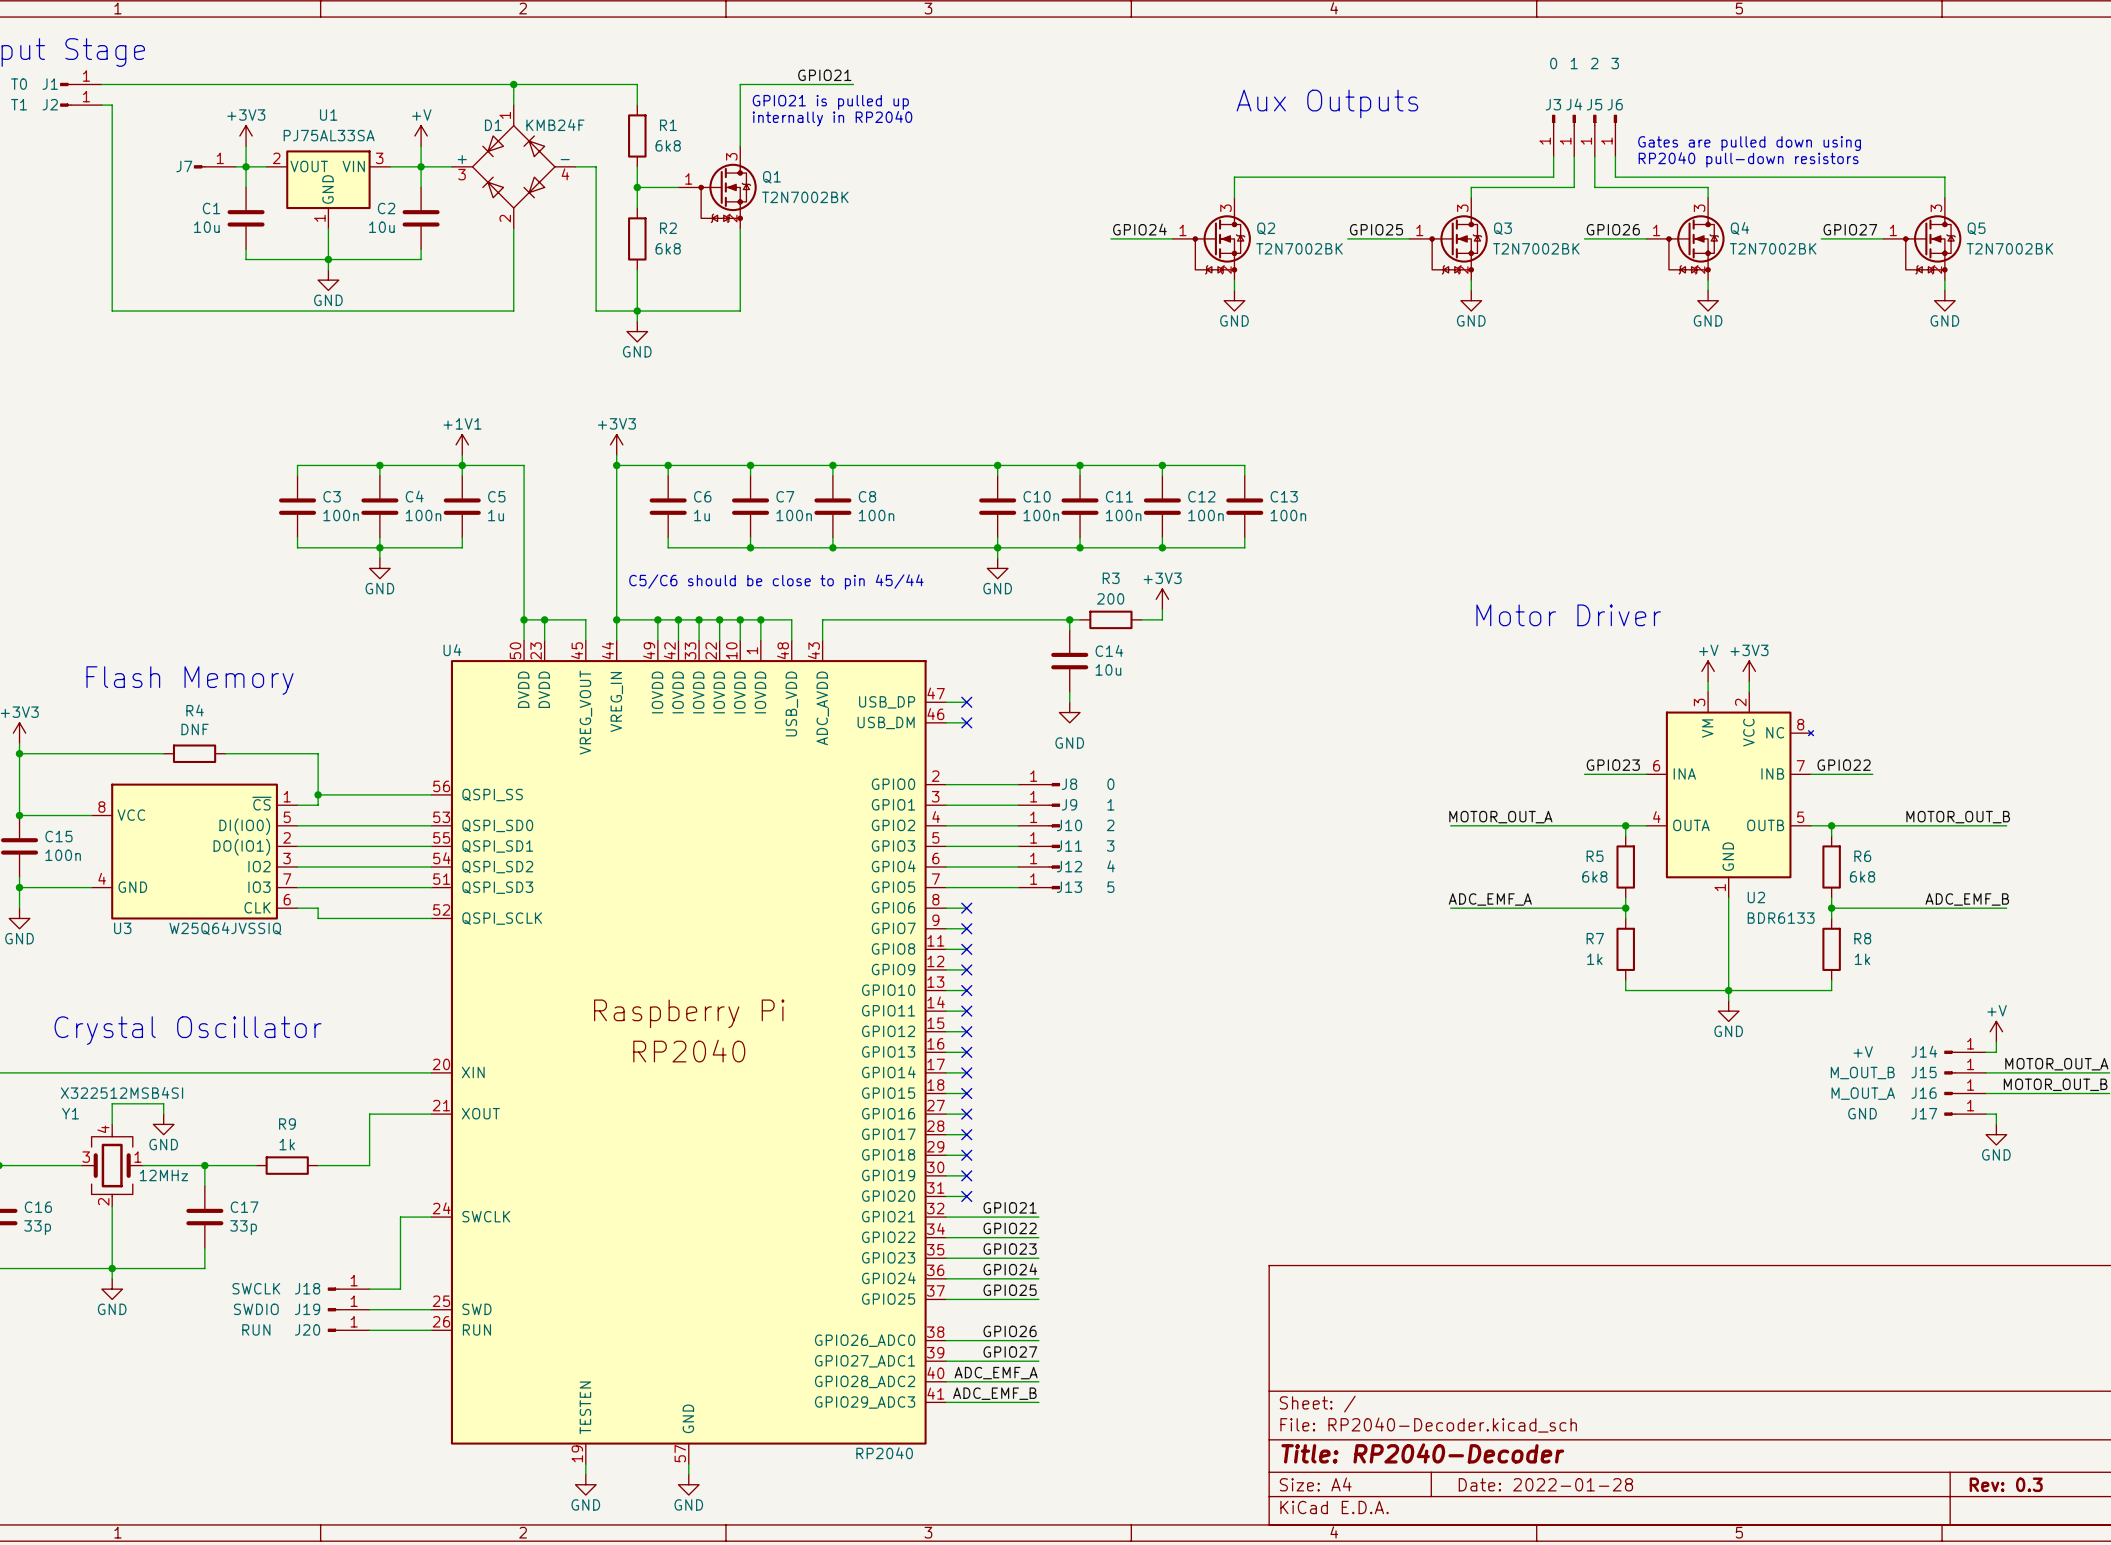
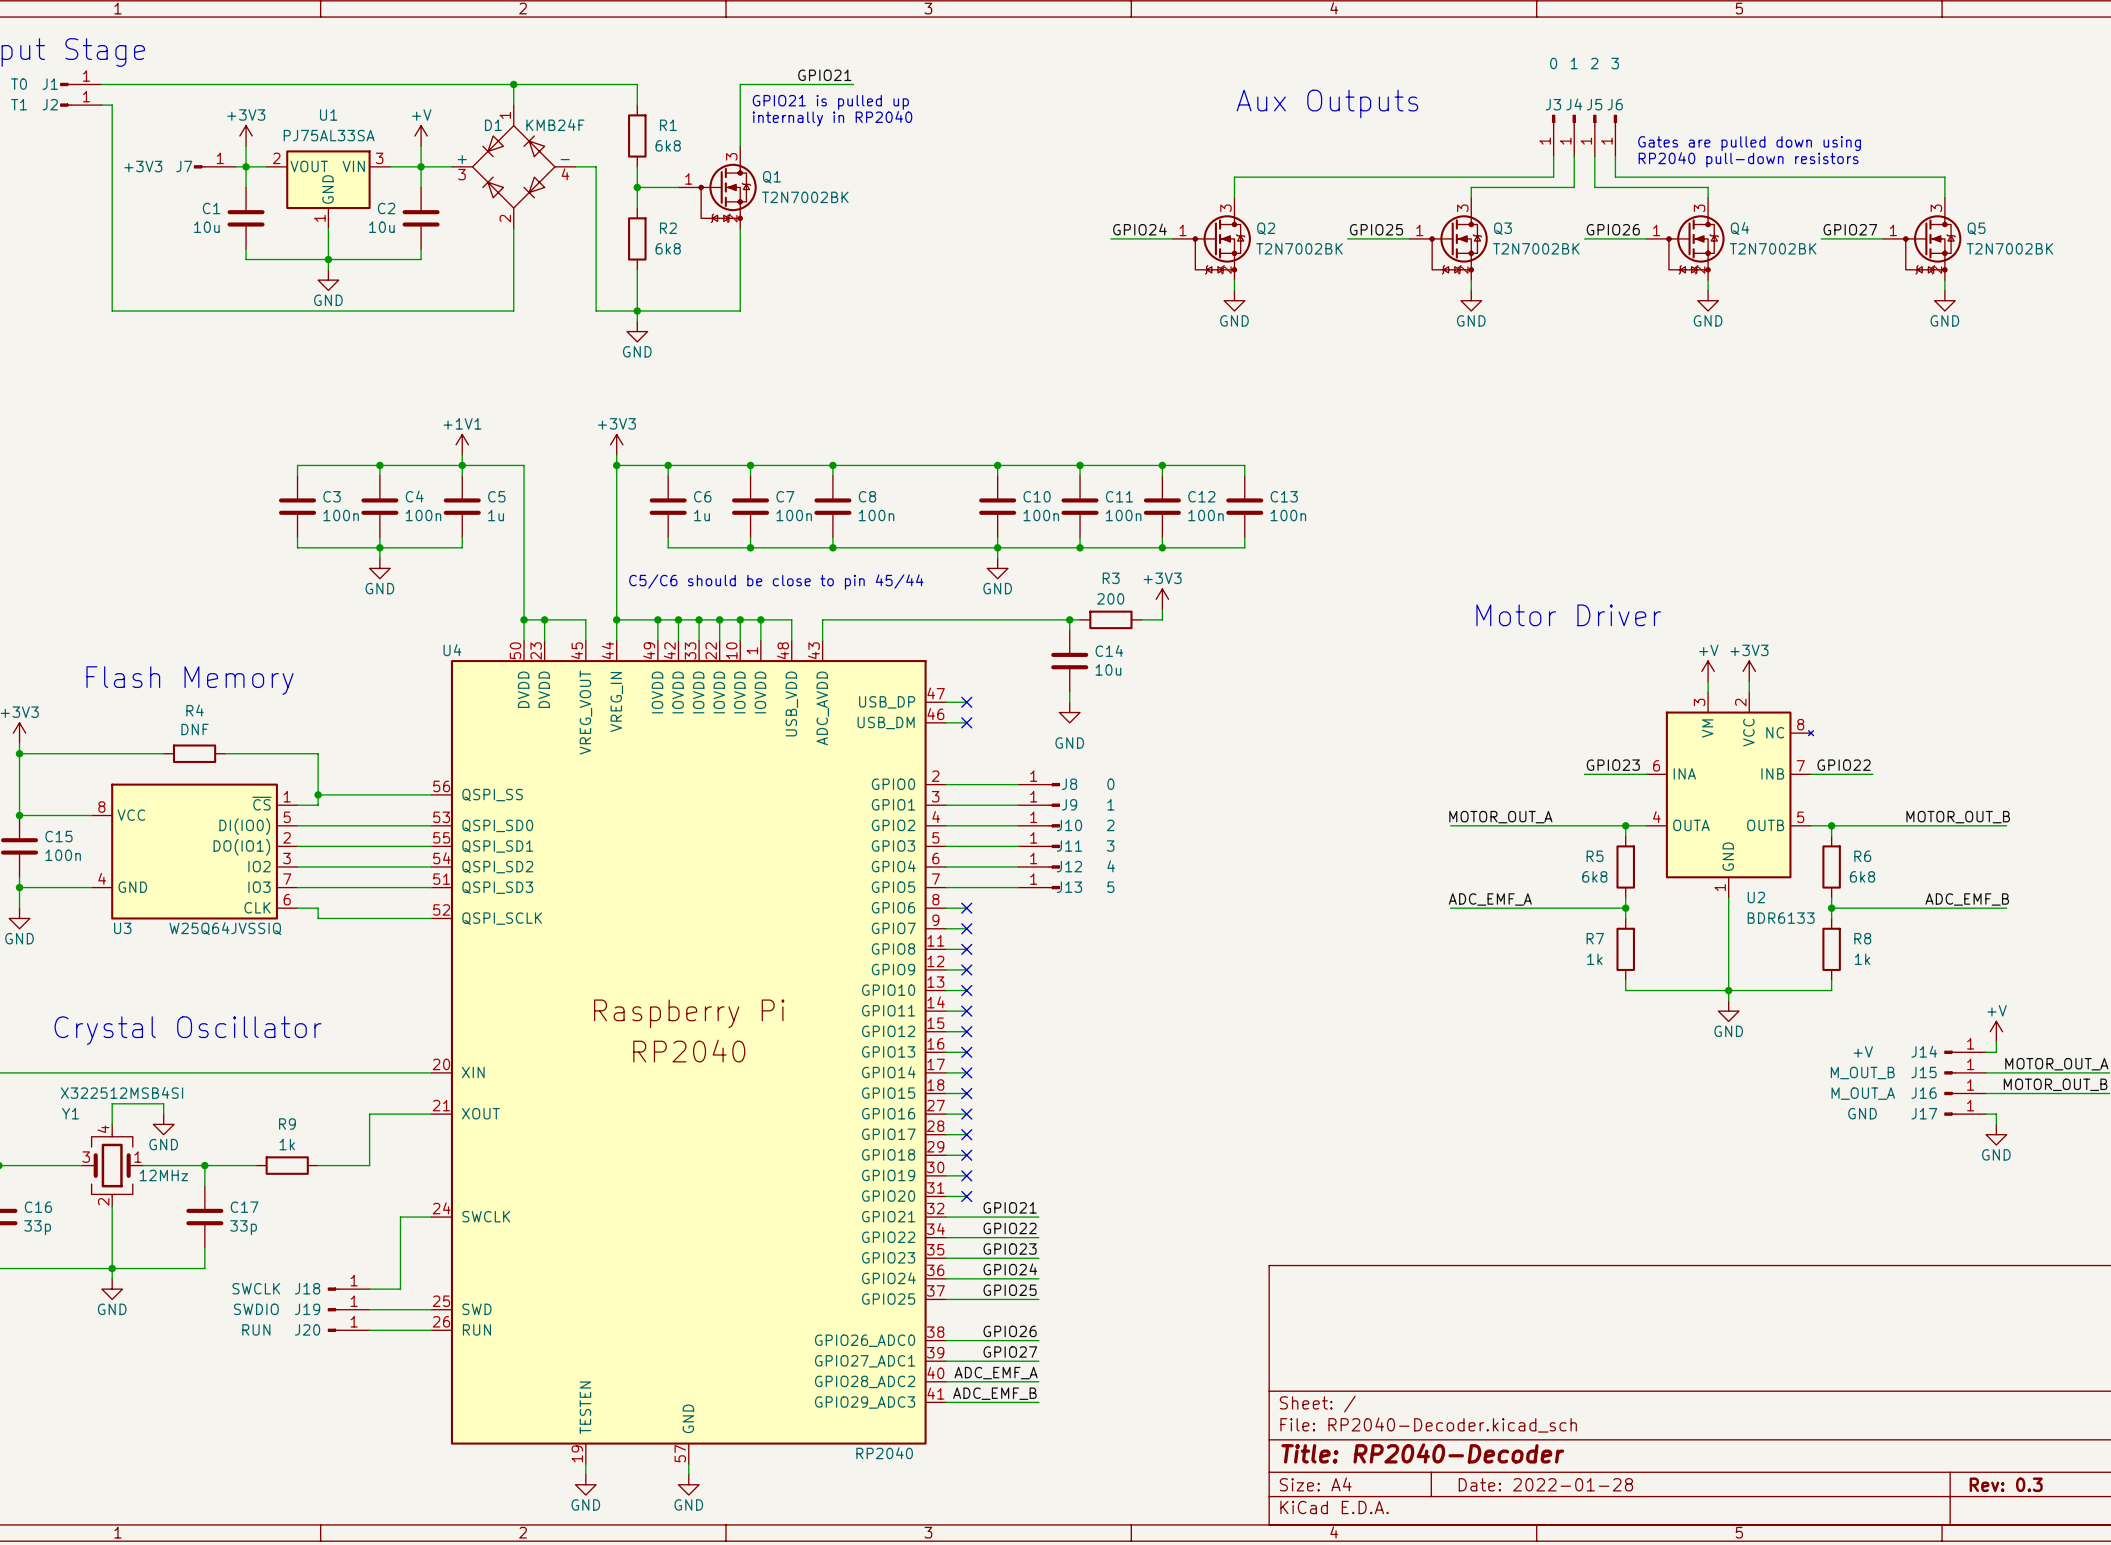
J7 value: none -> +3V3 (143, 166)

